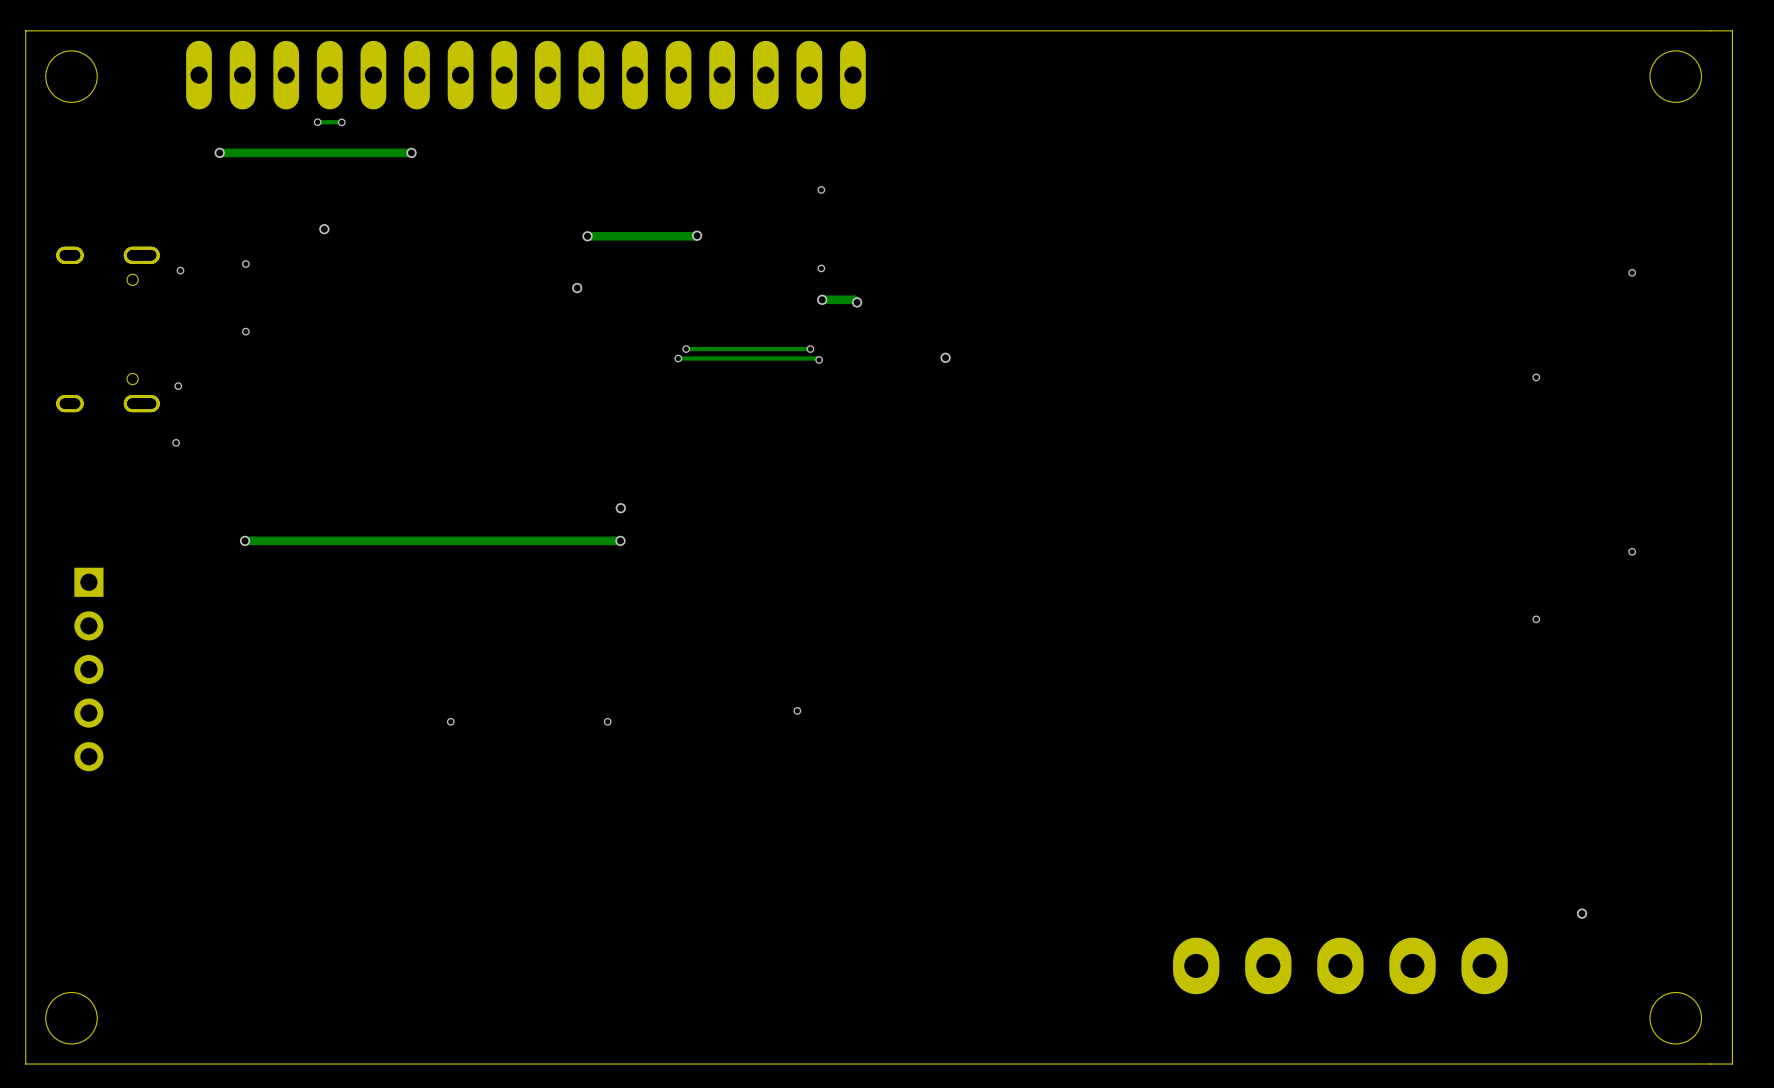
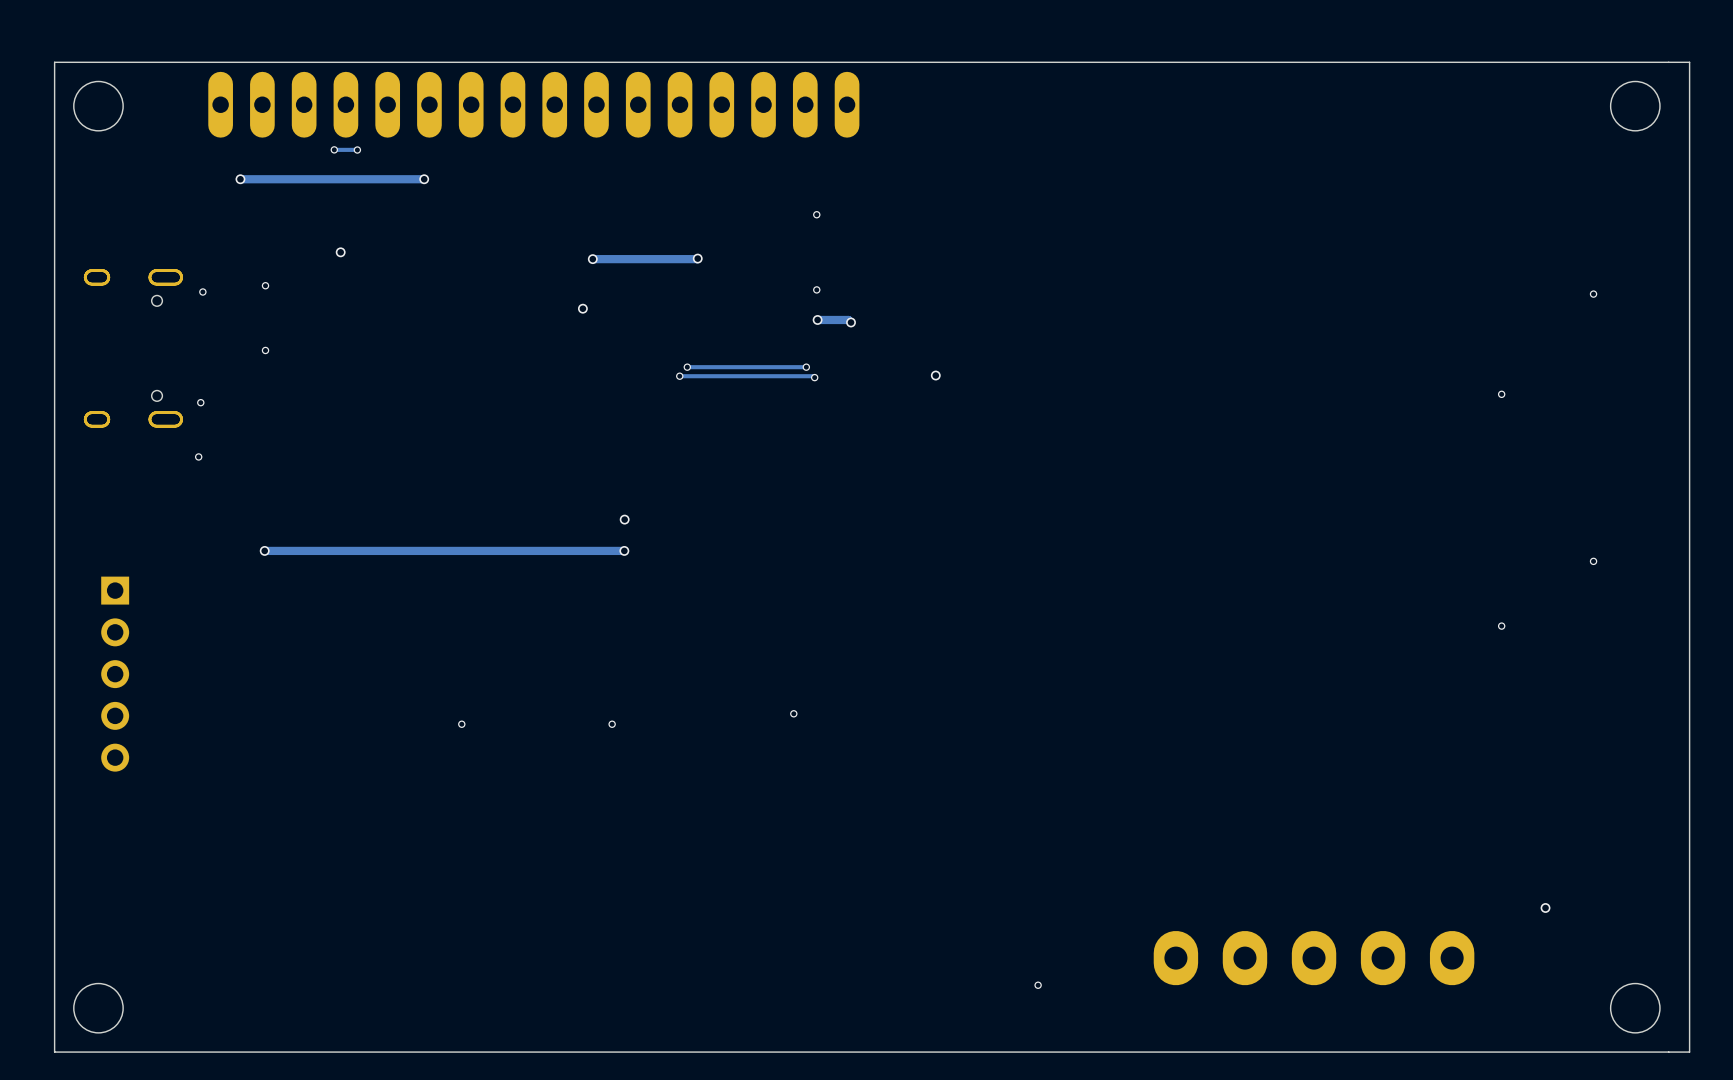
via: none -> (1038, 985)

